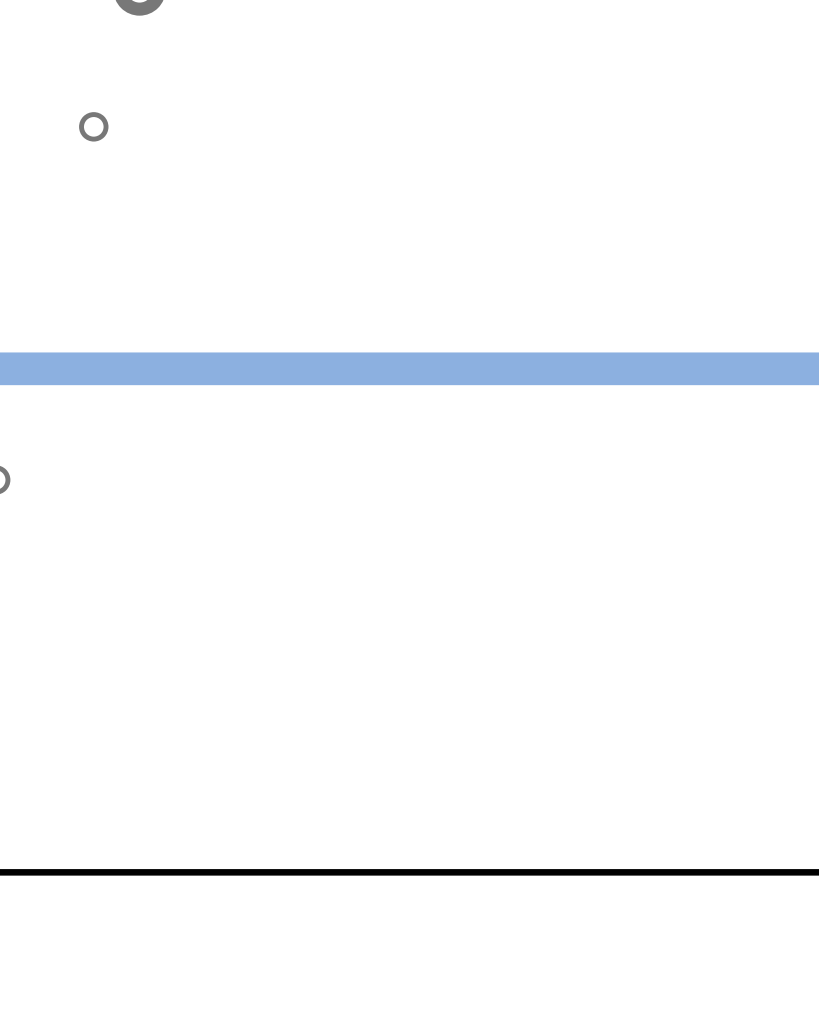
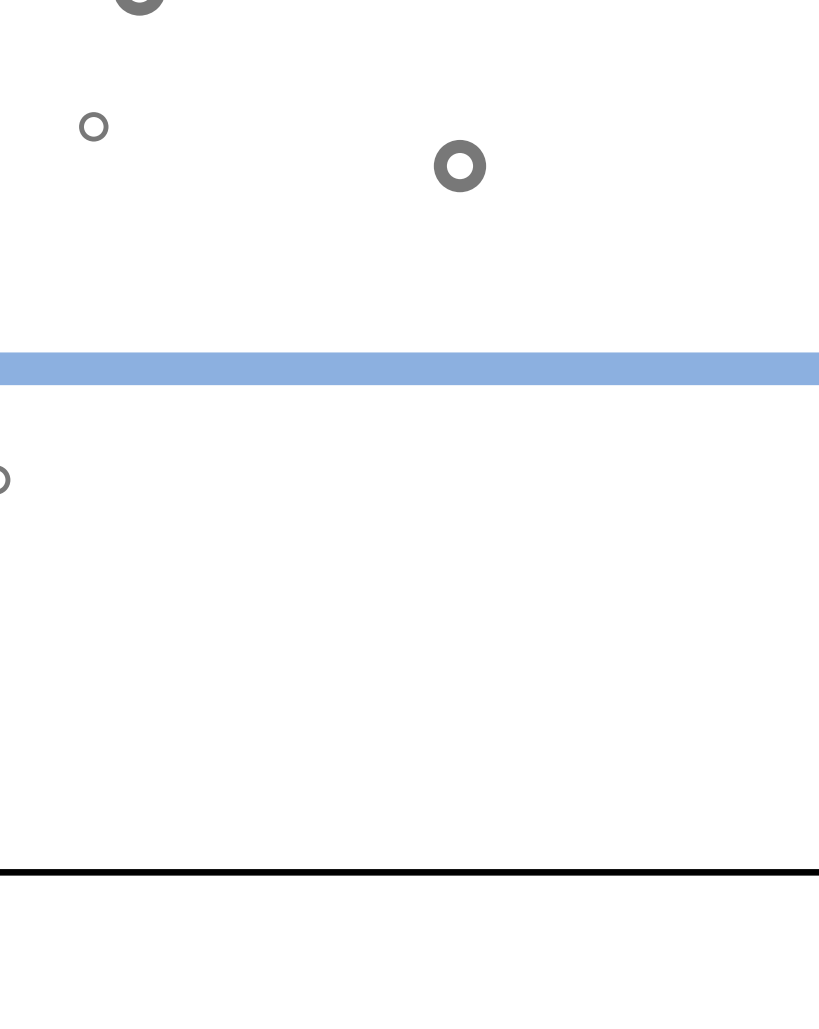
via: none -> (459, 166)

